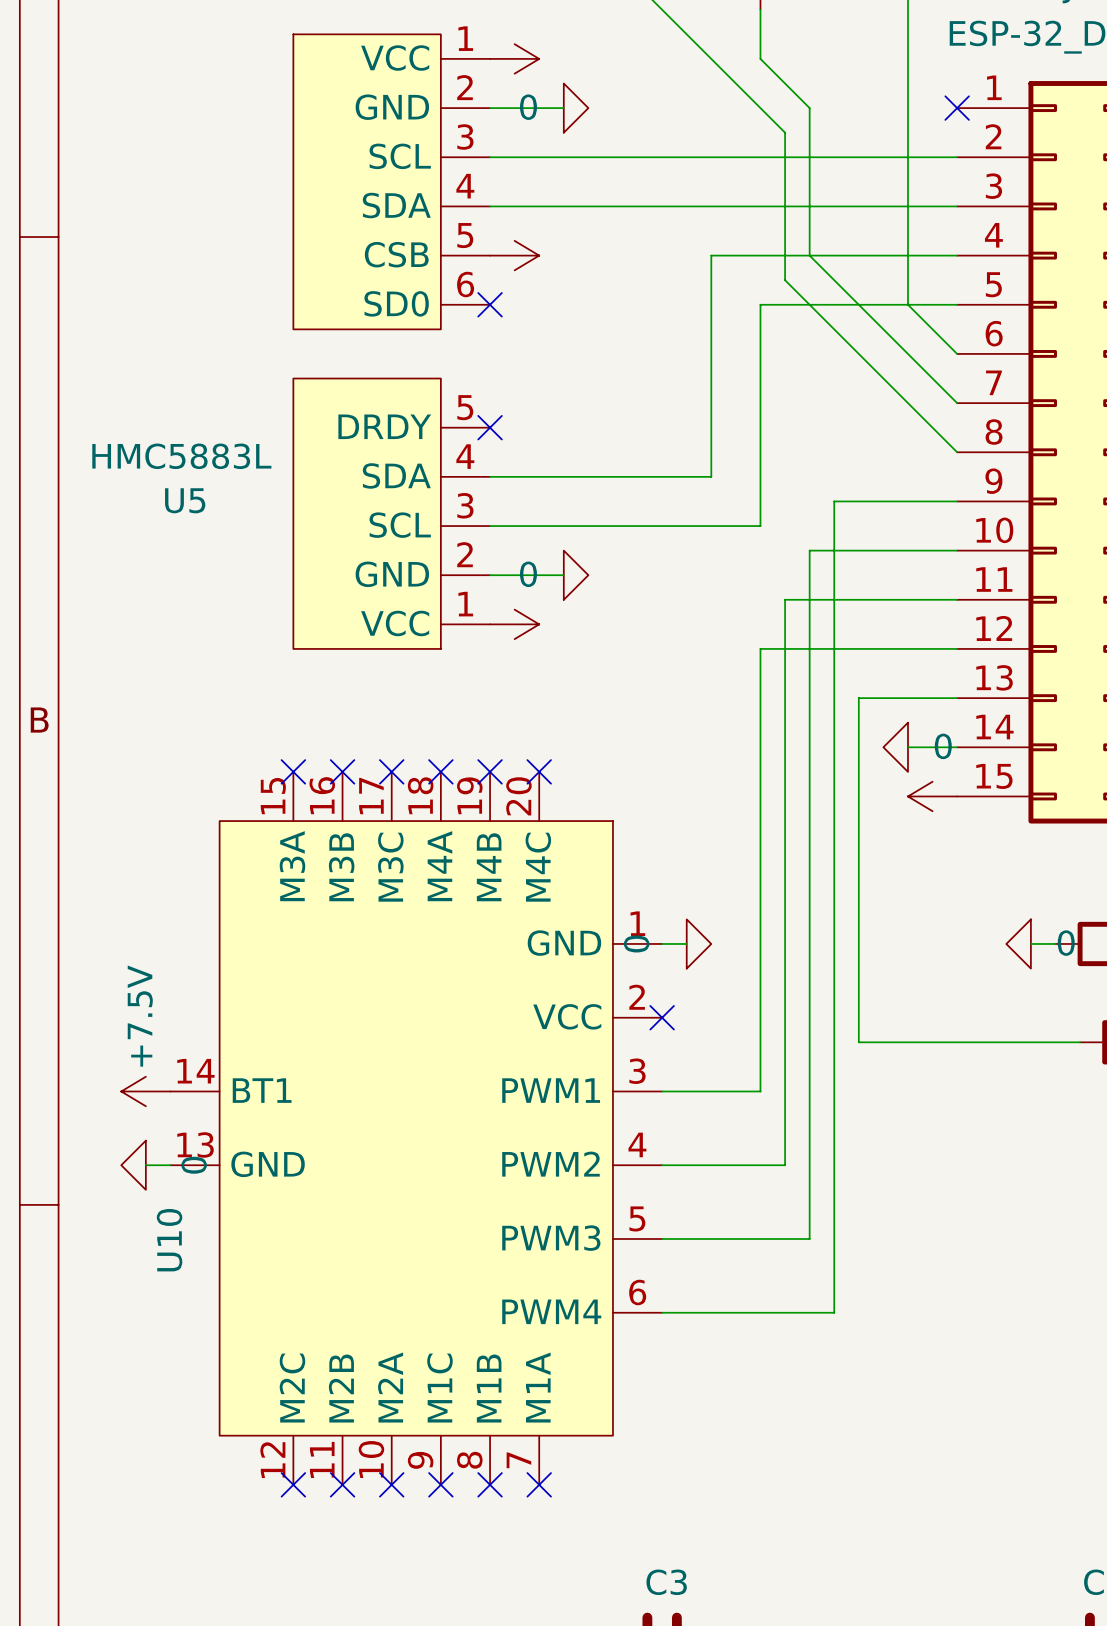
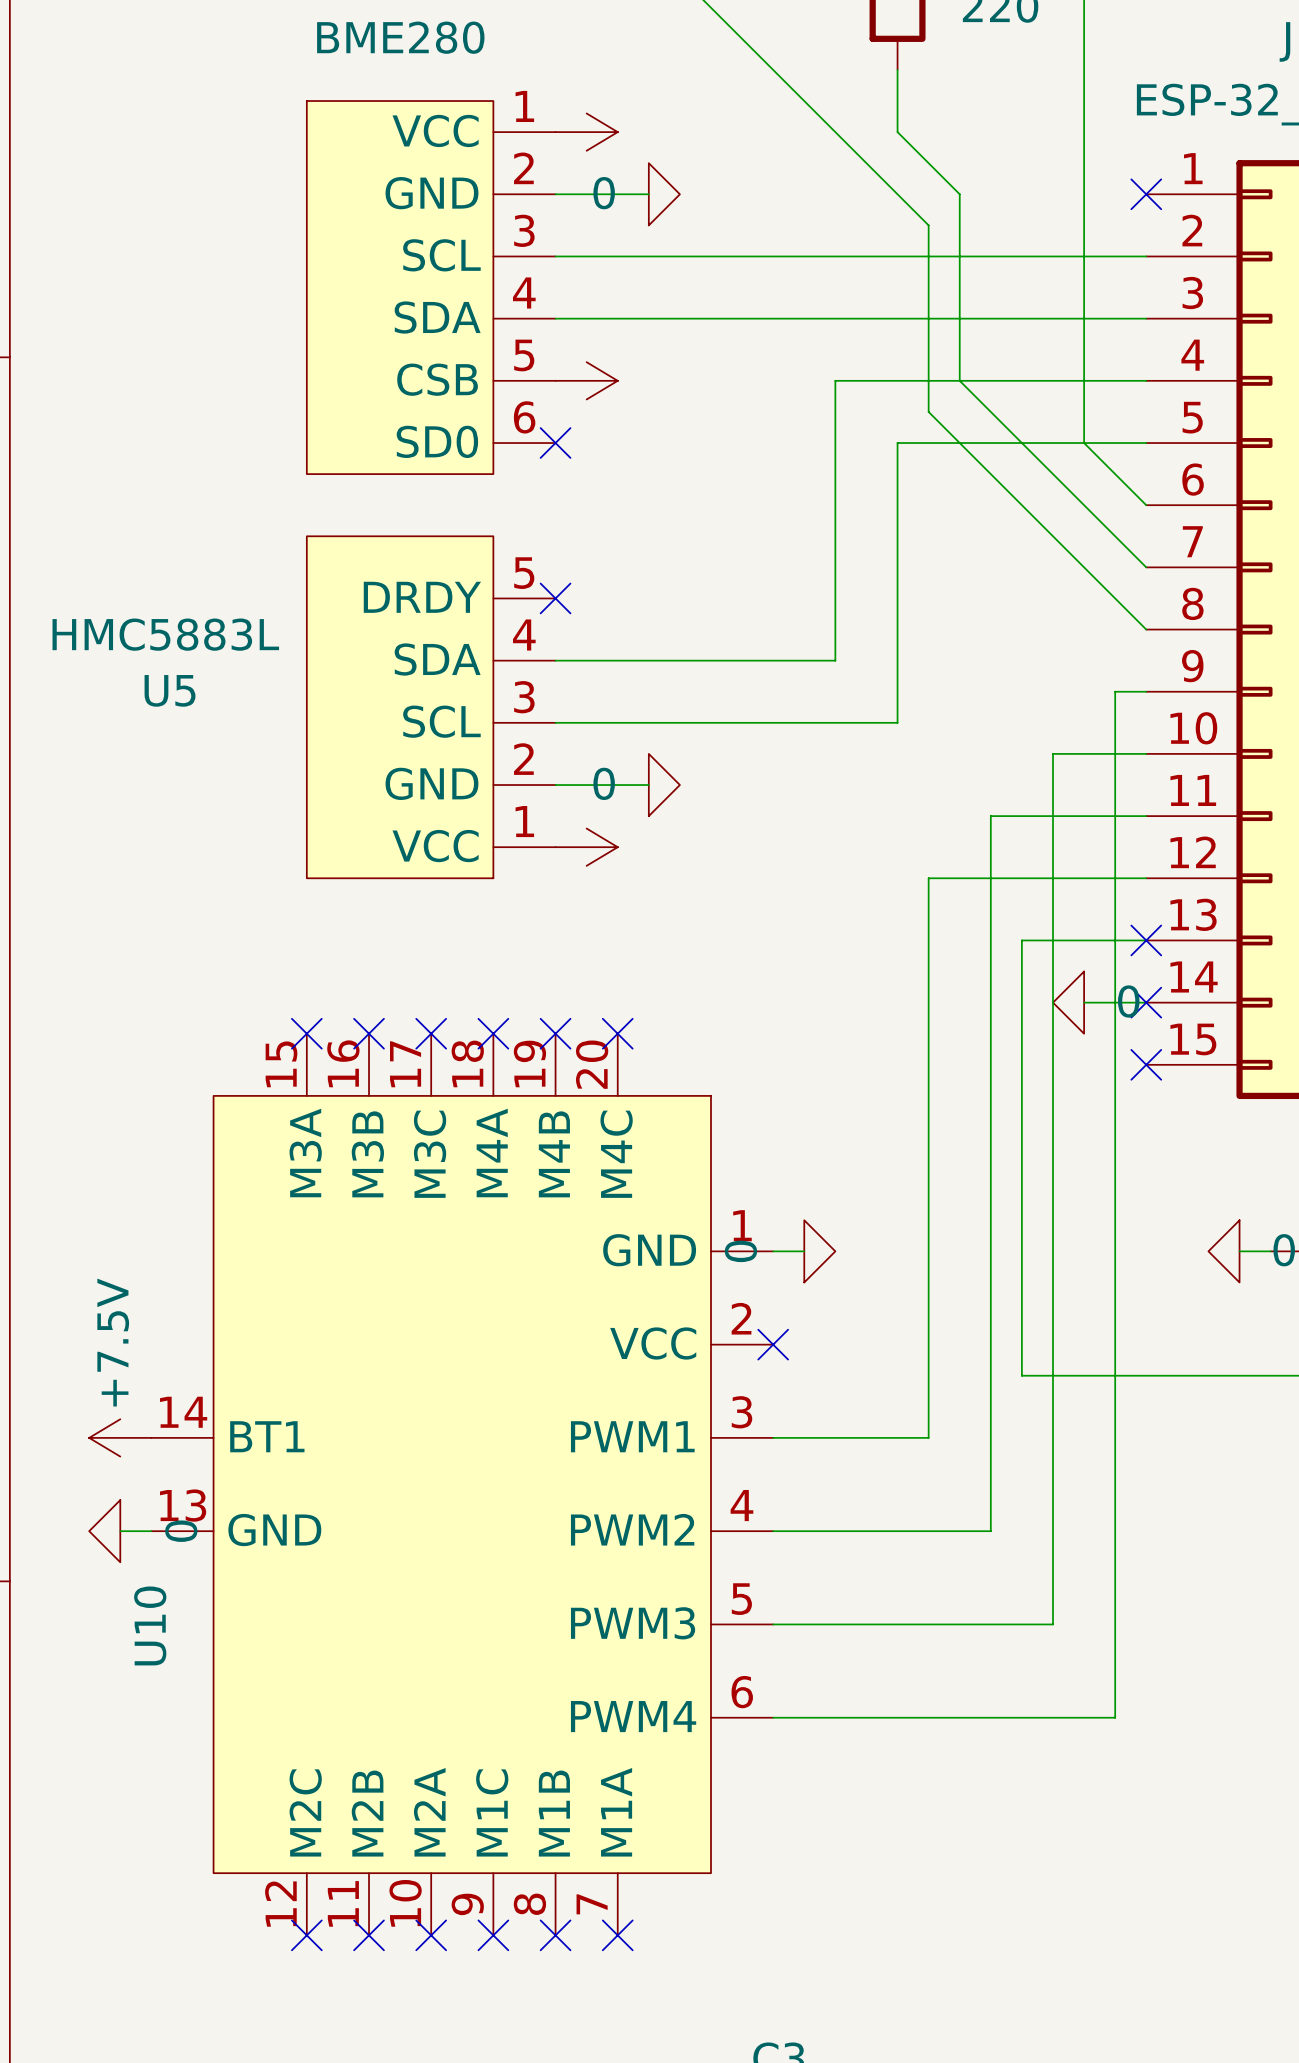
wire: (932, 501) (834, 501) (834, 599) (785, 599) (785, 648) (760, 648) (760, 1091) -> (1115, 691) (1115, 1717) (990, 1717)
wire: (883, 550) (809, 550) (809, 1239) -> (1053, 753) (1053, 1624) (959, 1624)
no-connect mark: none -> (1146, 940)
no-connect mark: none -> (1146, 1002)
power symbol: (932, 796) -> none
no-connect mark: none -> (1146, 1064)
wire: (785, 1091) (785, 1165) -> (928, 1437) (897, 1437)
wire: (834, 1165) (834, 1312) -> (990, 1531) (928, 1531)

